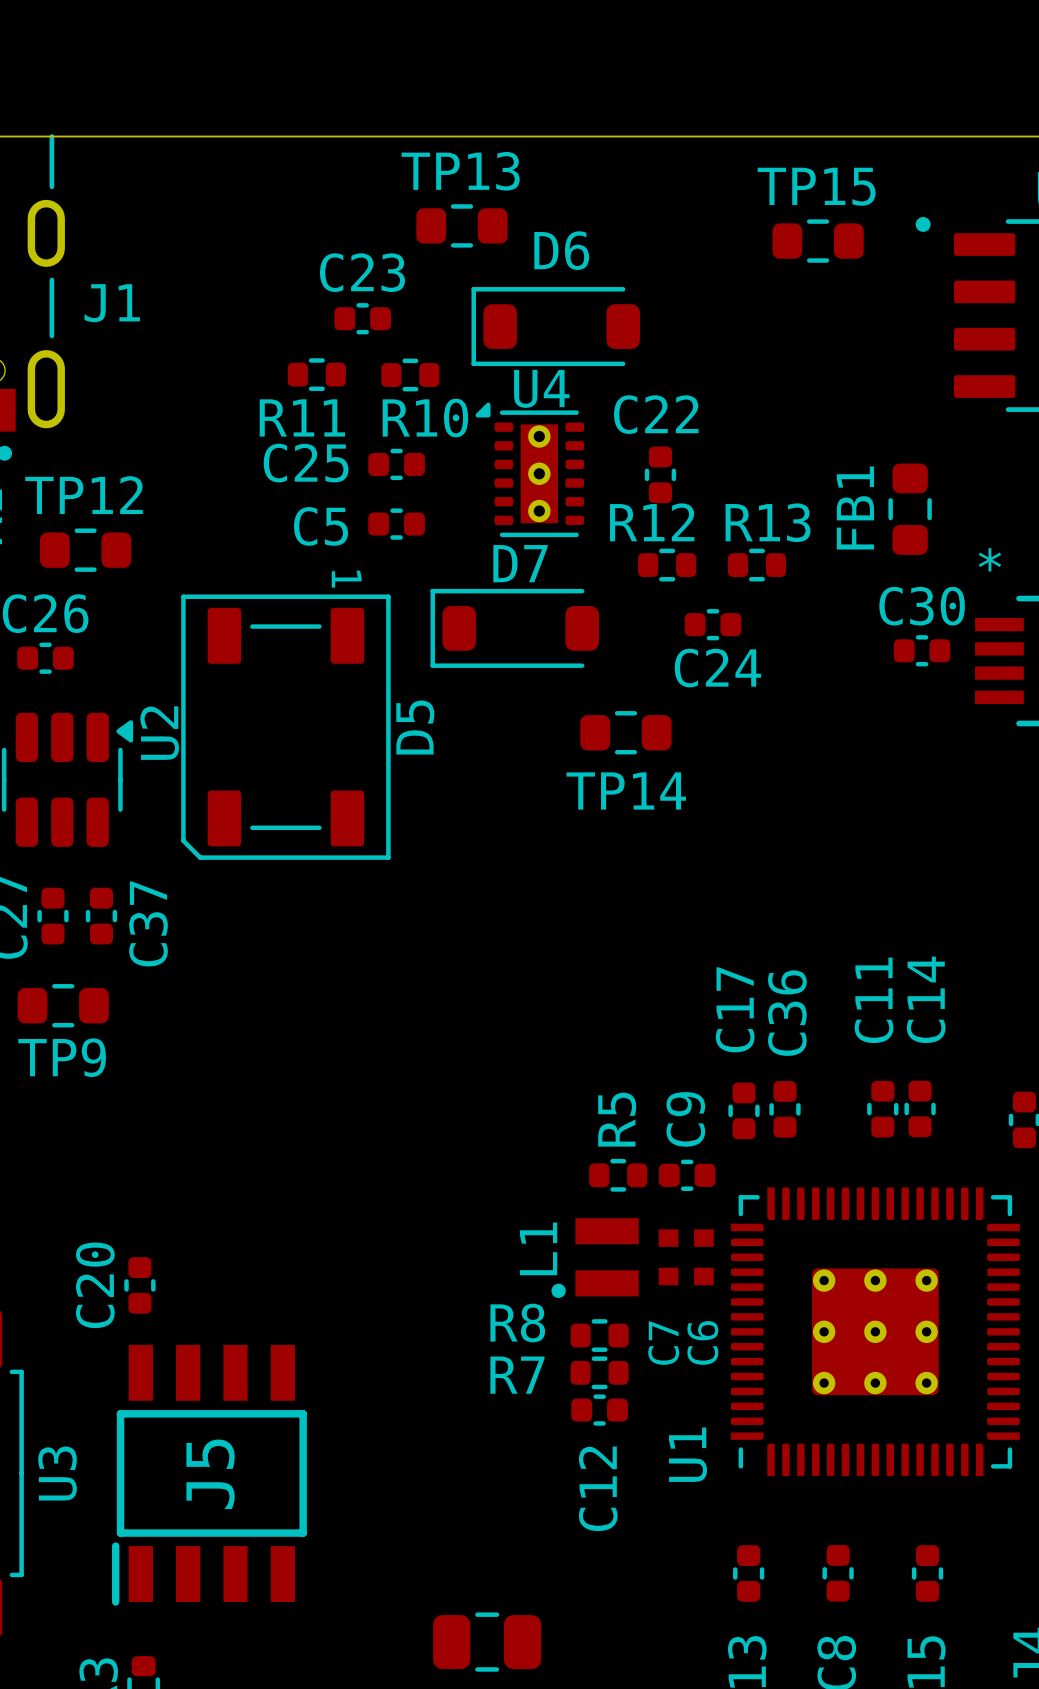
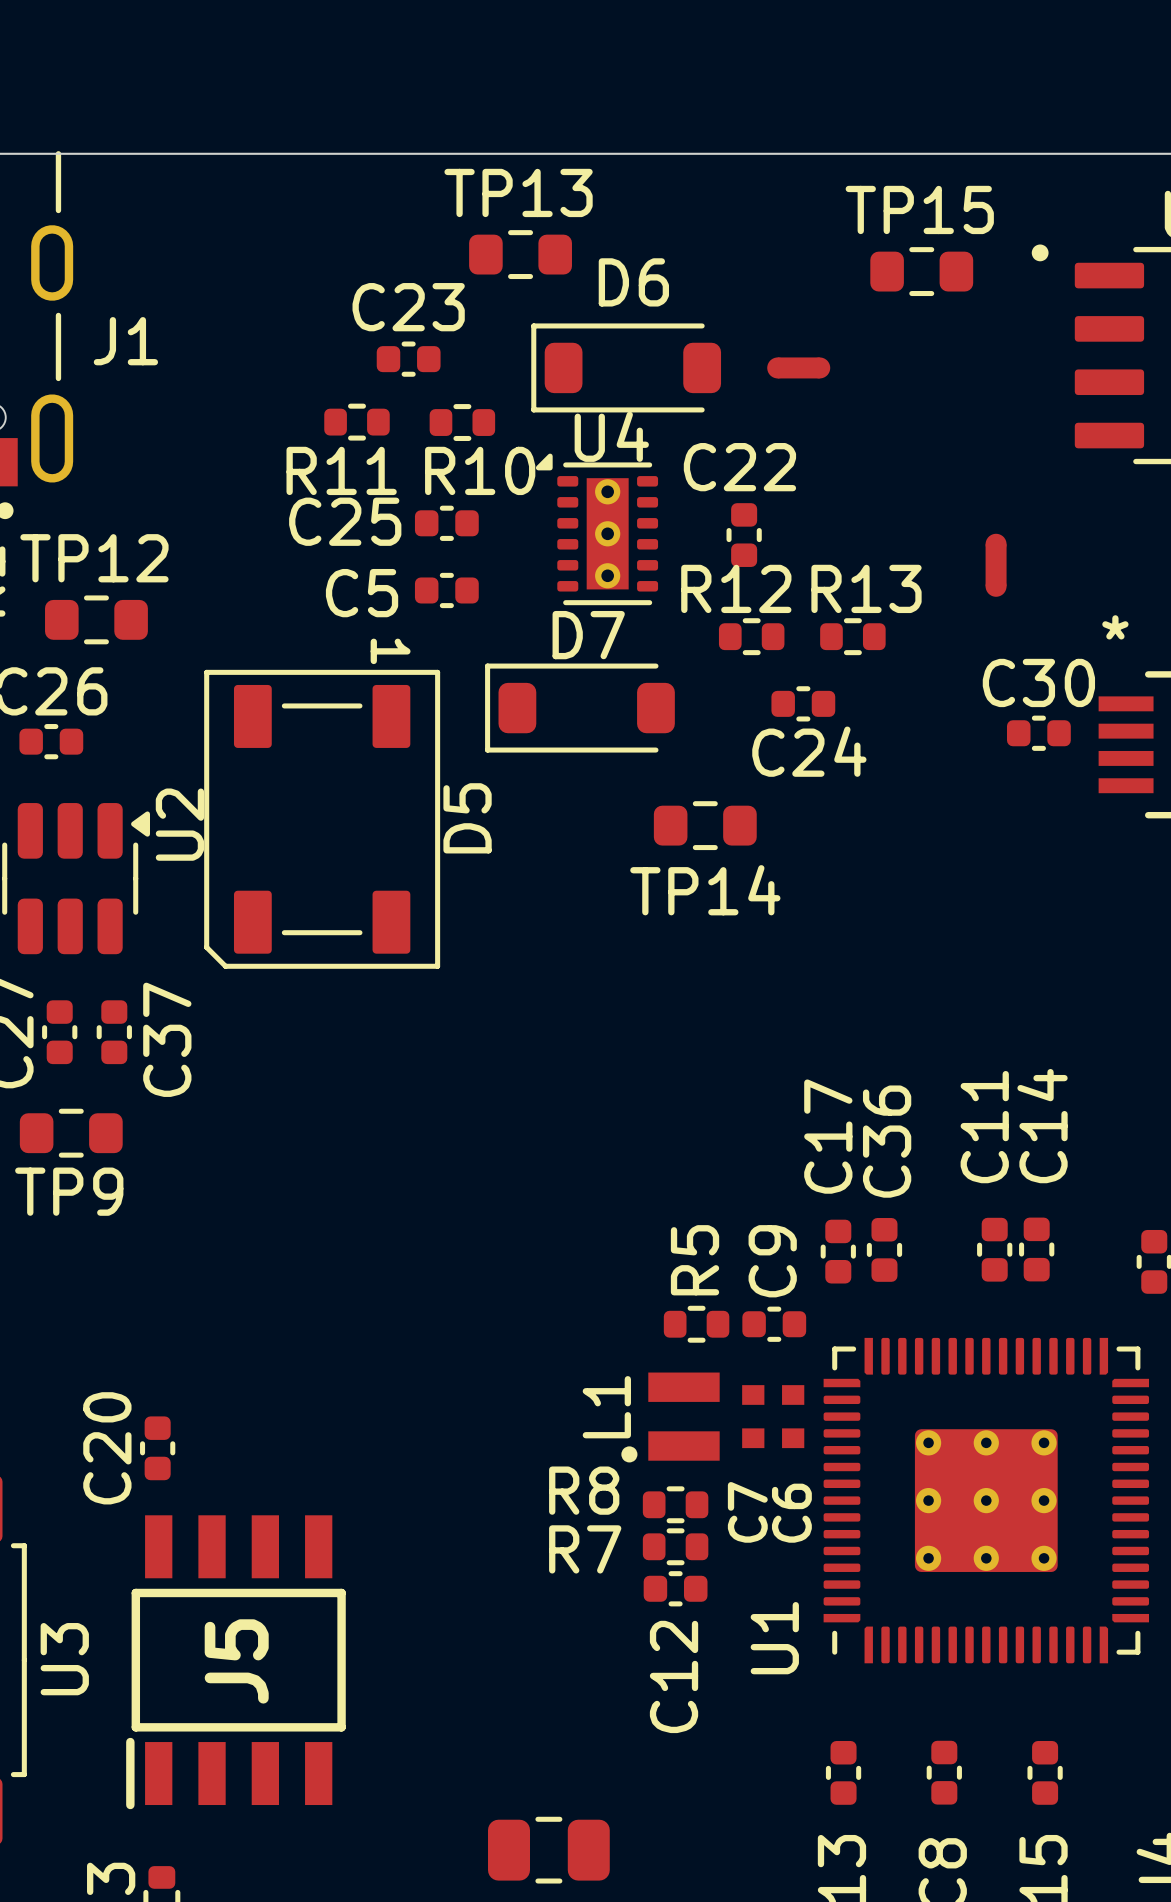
part: none -> (798, 367)
part: none -> (996, 565)
FB1: (910, 509) -> none

